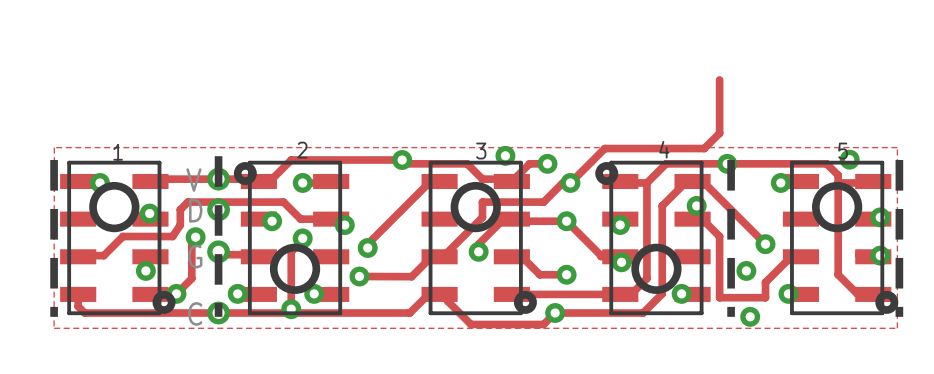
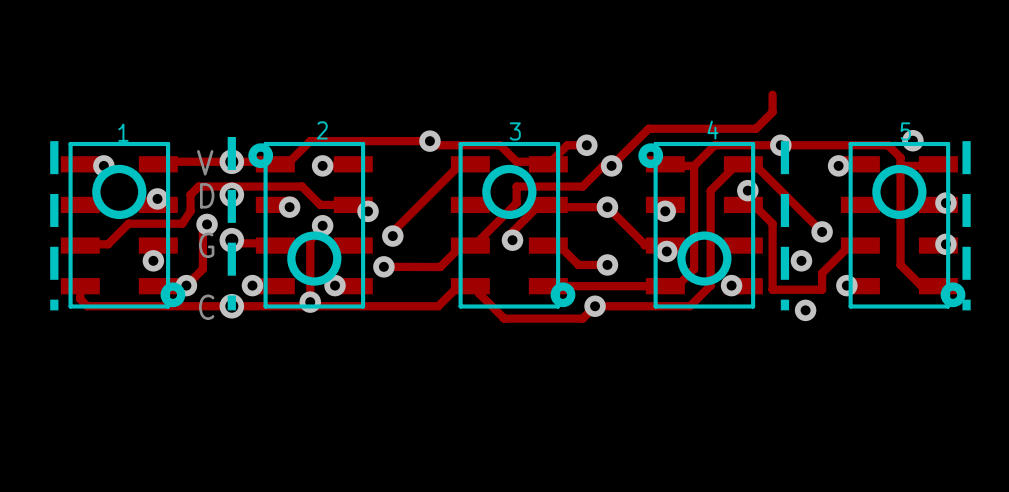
track: (719, 79) (719, 117) -> none
zone outline: (54, 147) (54, 328) (897, 328) (897, 147) (54, 147) -> none
via: (505, 155) -> none

